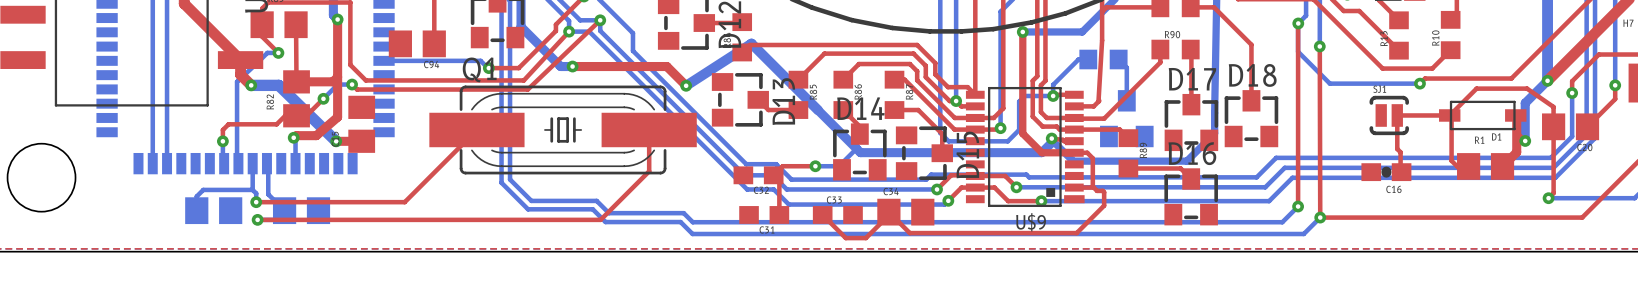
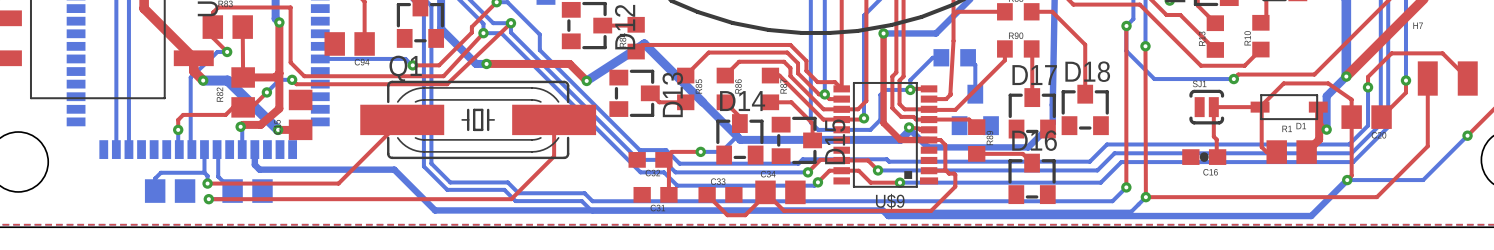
bottom track: none -> (254, 149) (254, 164) (259, 169) (394, 169) (435, 210) (882, 210) (888, 216) (1311, 216) (1347, 180)

